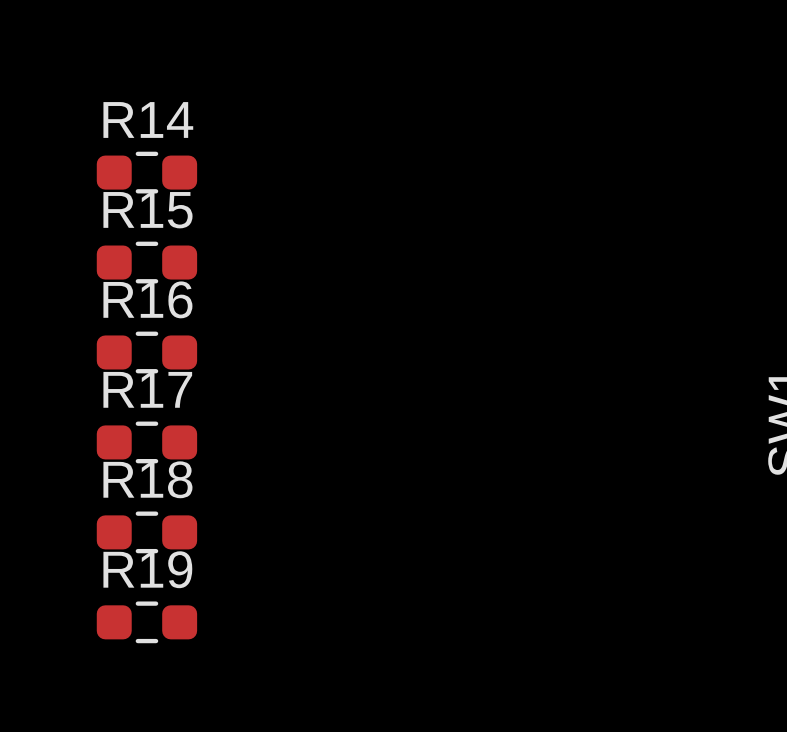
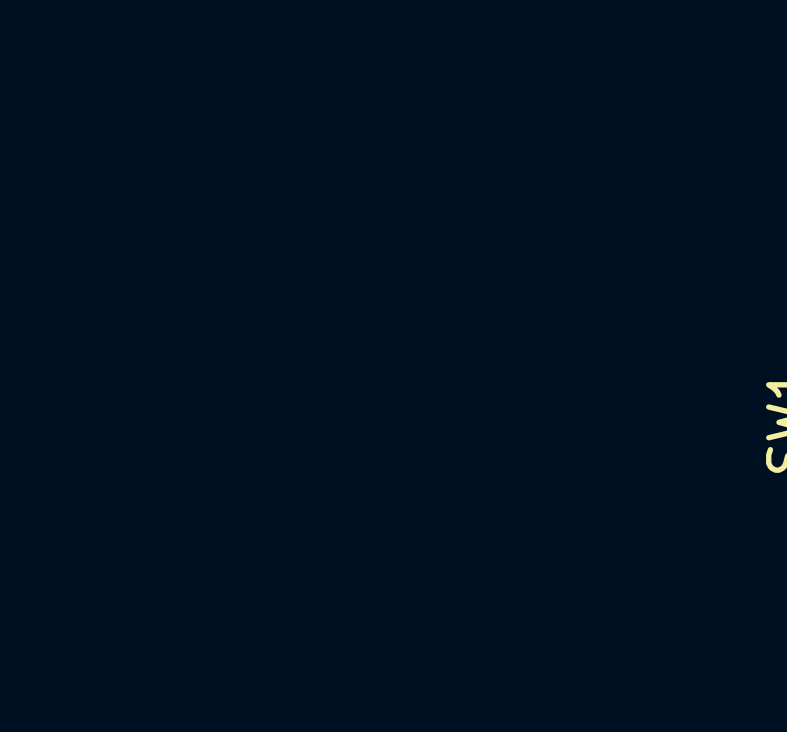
R14: (146, 172) -> none
R15: (146, 262) -> none
R16: (146, 352) -> none
R17: (146, 442) -> none
R18: (146, 532) -> none
R19: (146, 622) -> none

